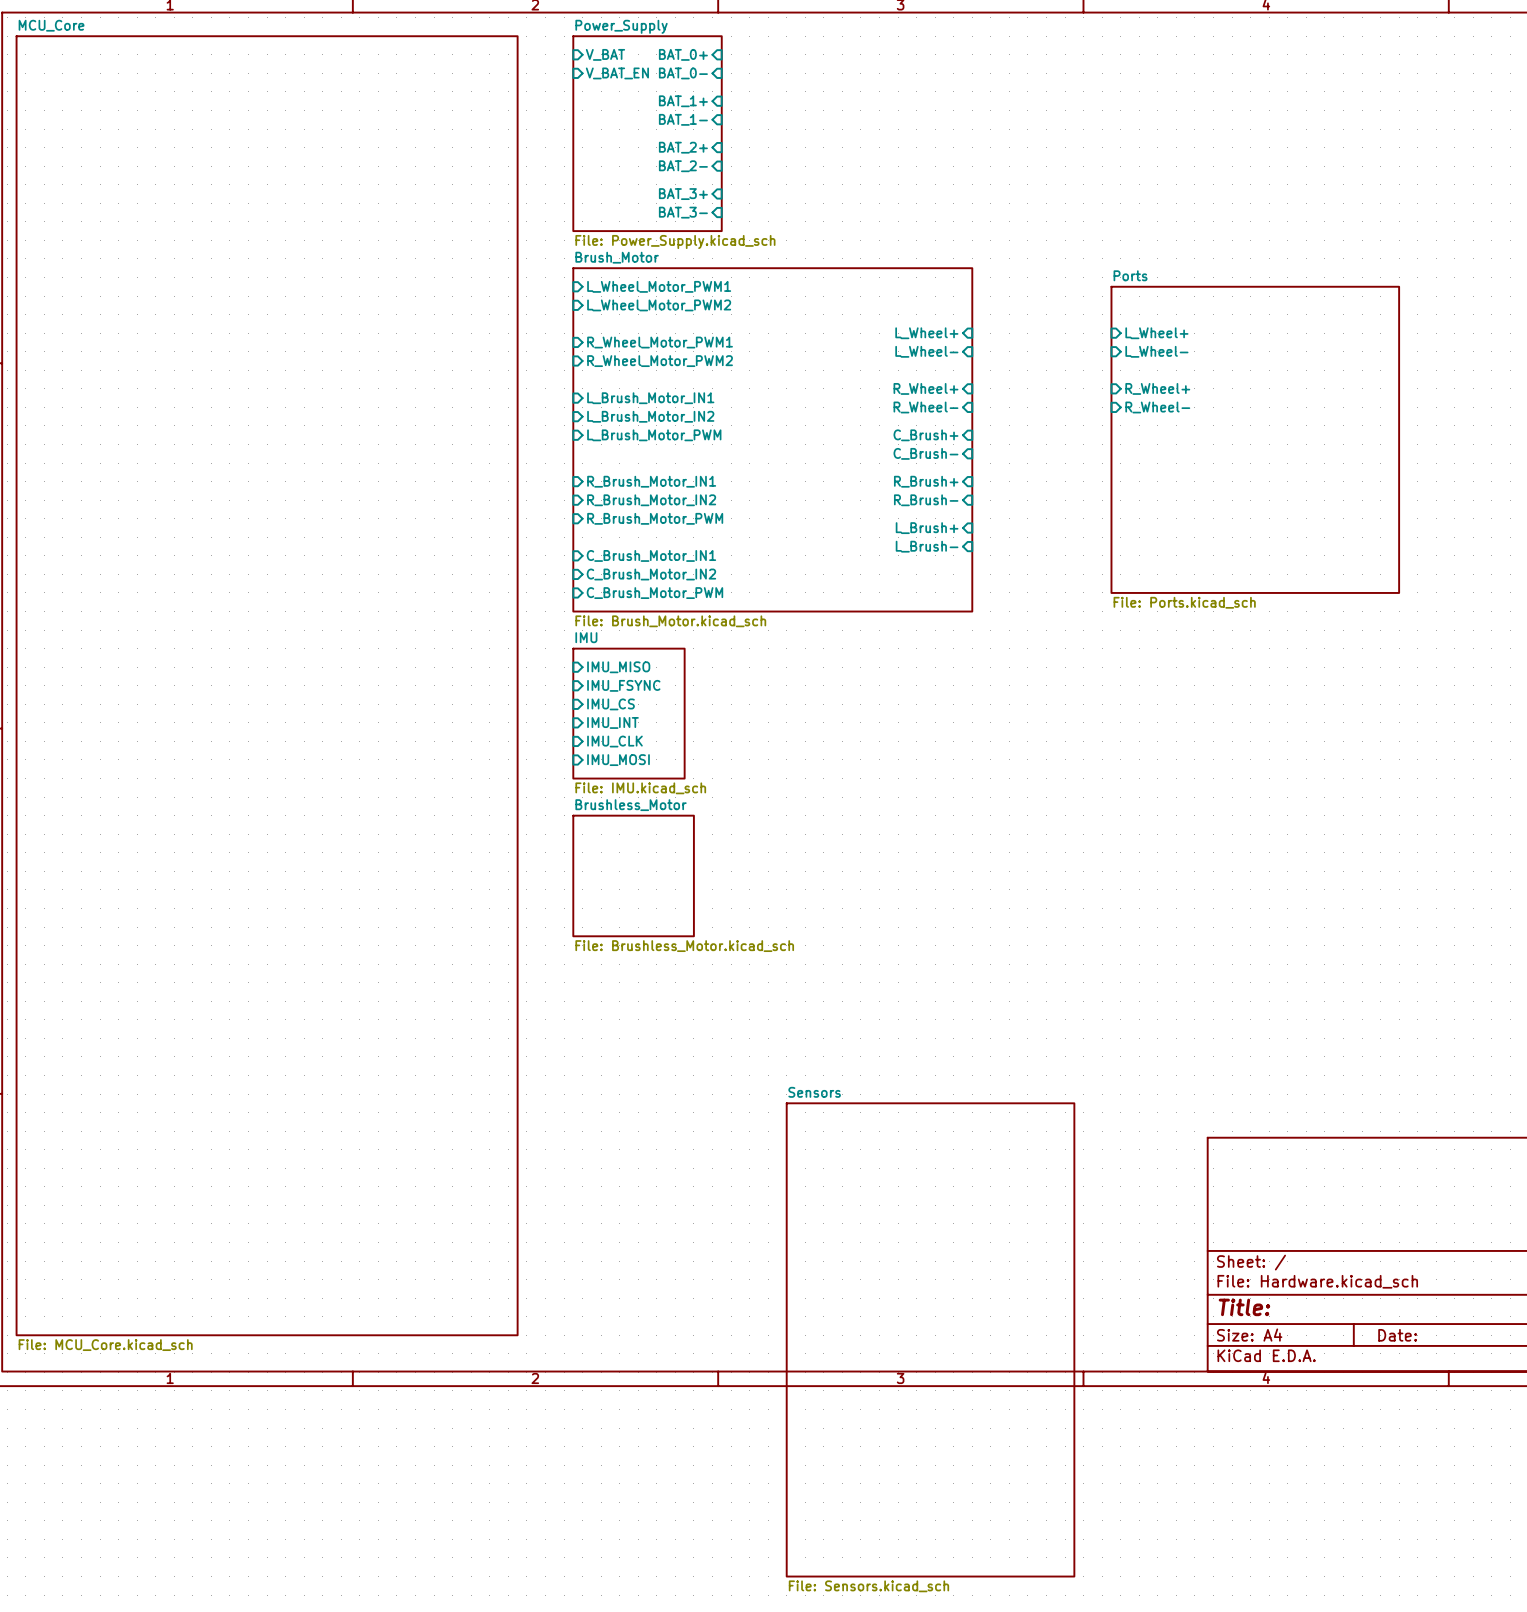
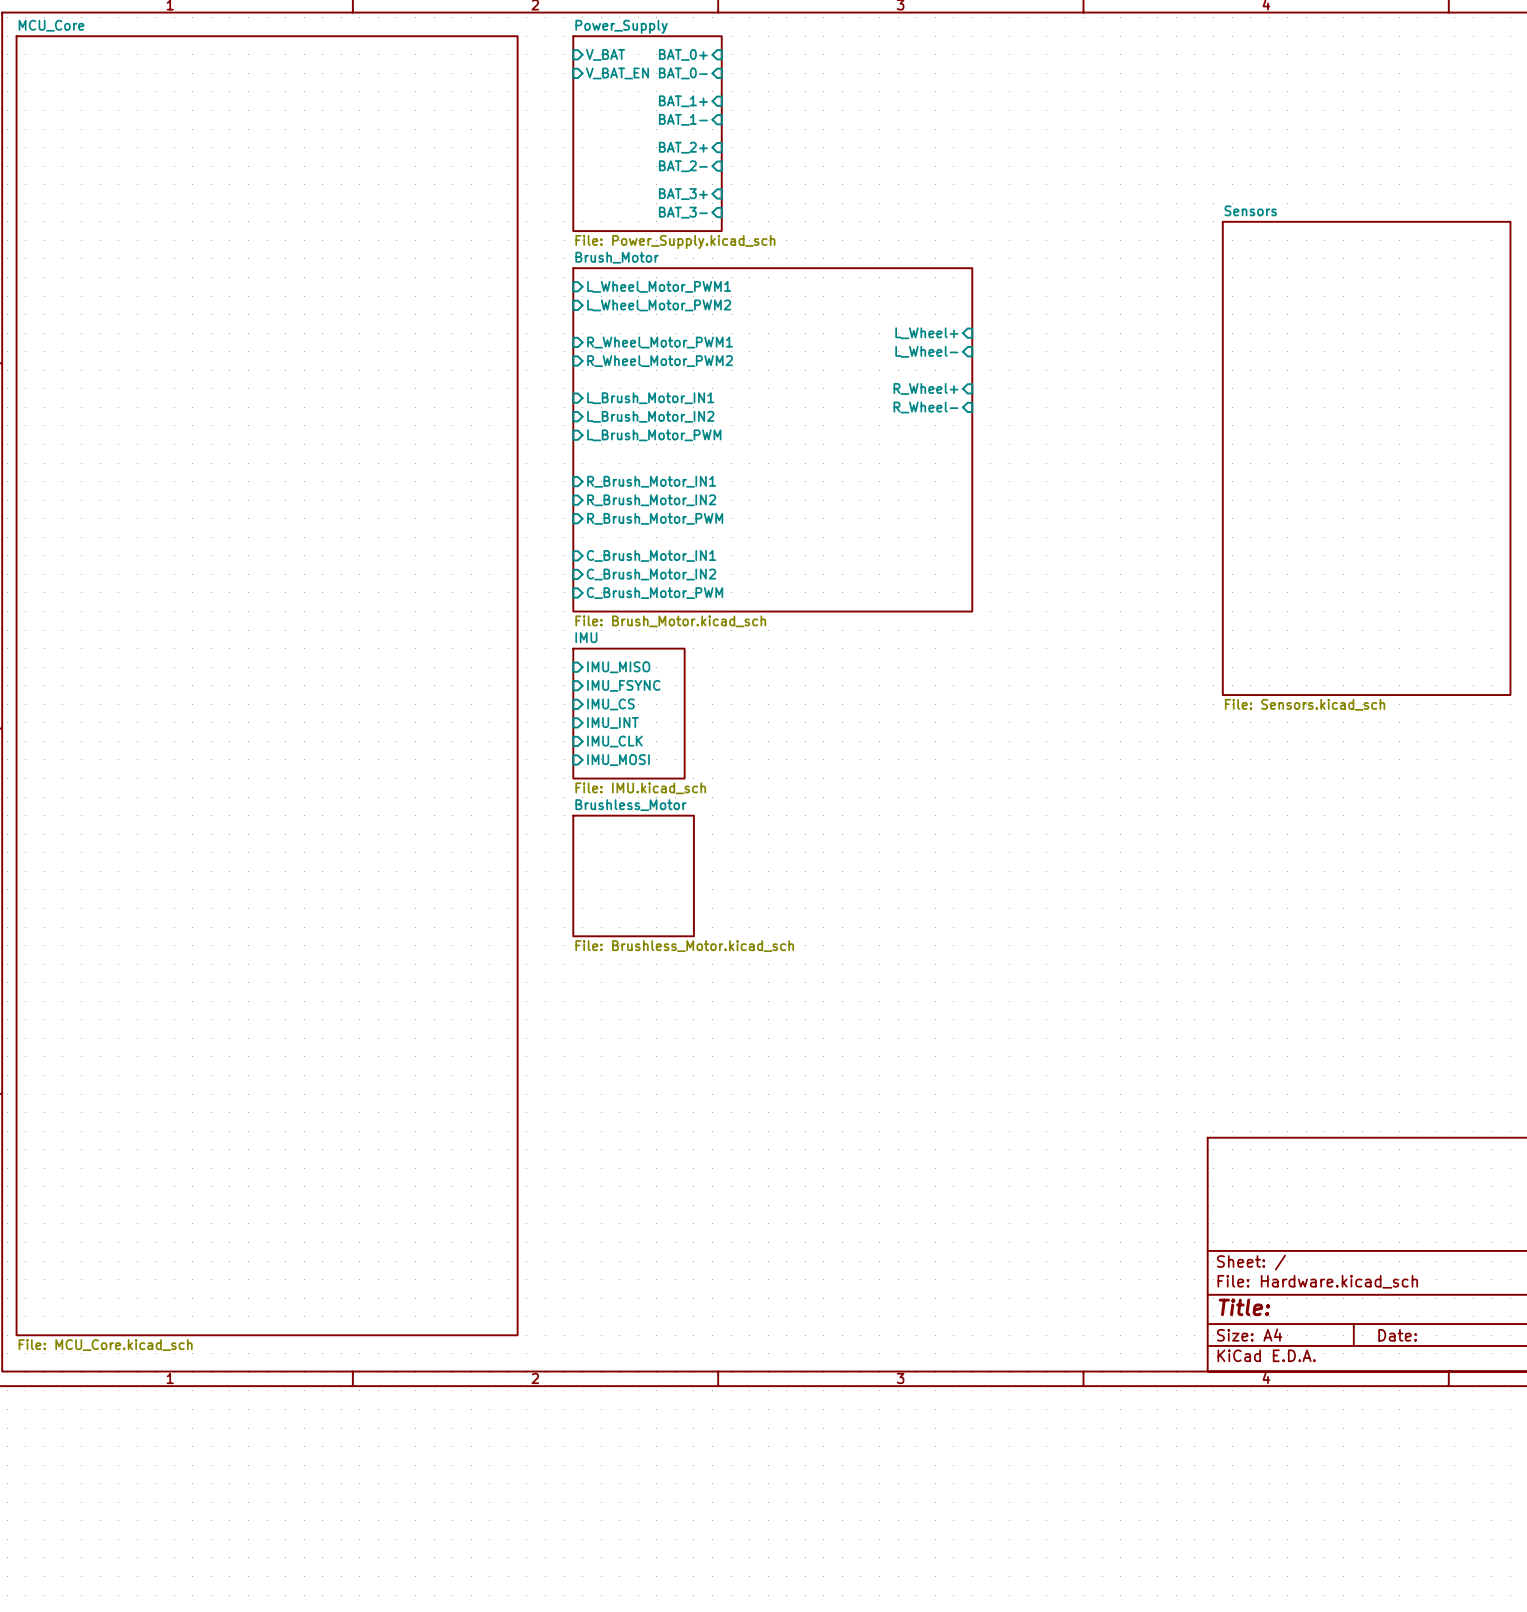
sheet pin: L_Wheel+ (1156, 333) -> none
sheet pin: L_Wheel- (1156, 351) -> none
sheet pin: R_Wheel+ (1157, 388) -> none
sheet pin: R_Wheel- (1157, 407) -> none
sheet pin: C_Brush+ (925, 435) -> none
sheet Ports: File: Ports.kicad_sch (1255, 439) -> none
sheet pin: C_Brush- (925, 453) -> none
sheet Sensors: none -> File: Sensors.kicad_sch (1366, 458)
sheet pin: R_Brush+ (926, 481) -> none
sheet pin: R_Brush- (926, 500) -> none
sheet pin: L_Brush+ (927, 528) -> none
sheet pin: L_Brush- (927, 546) -> none
sheet Sensors: File: Sensors.kicad_sch (930, 1339) -> none

